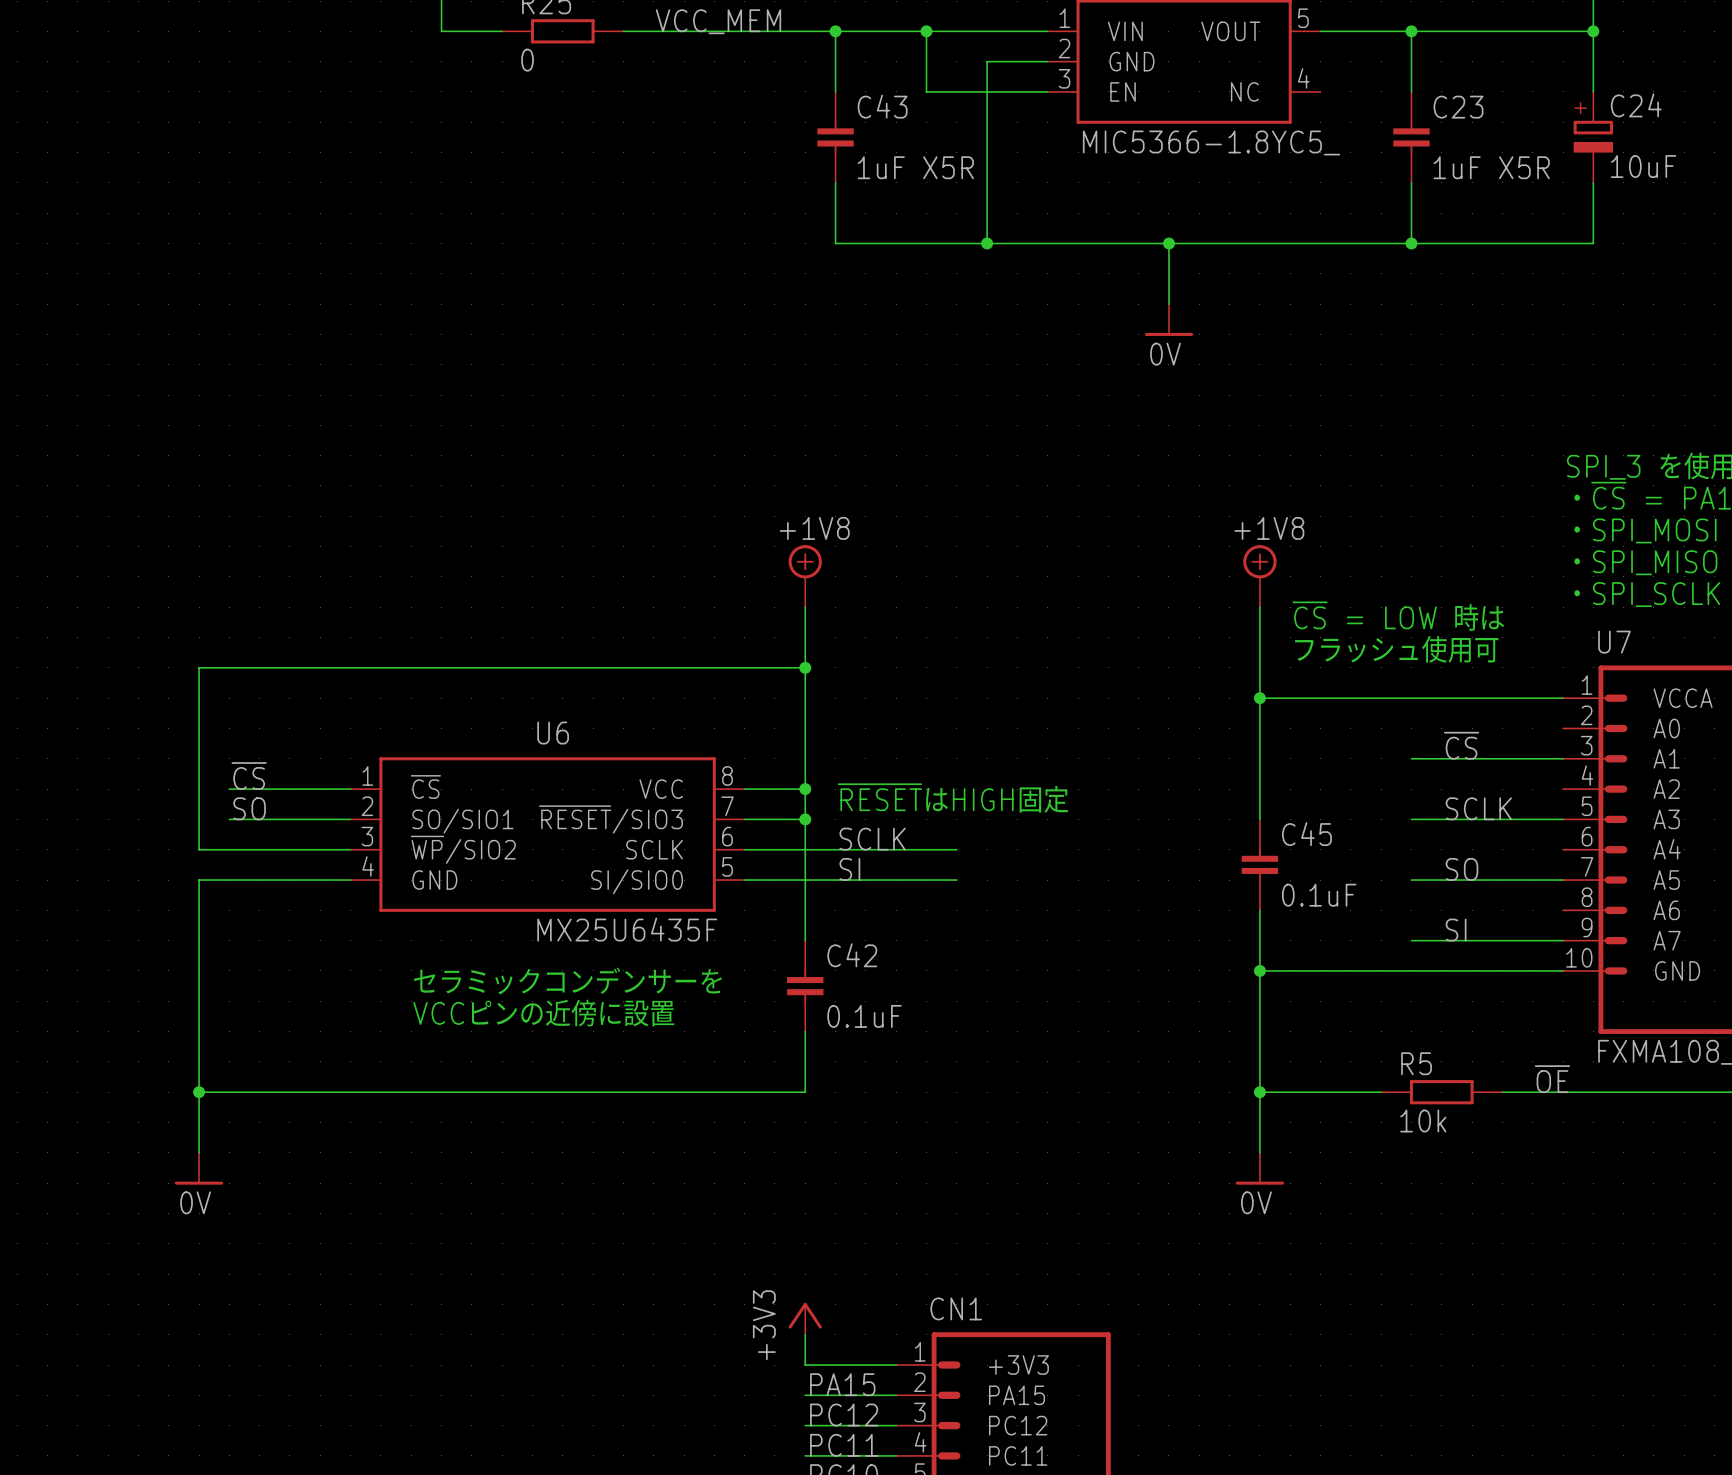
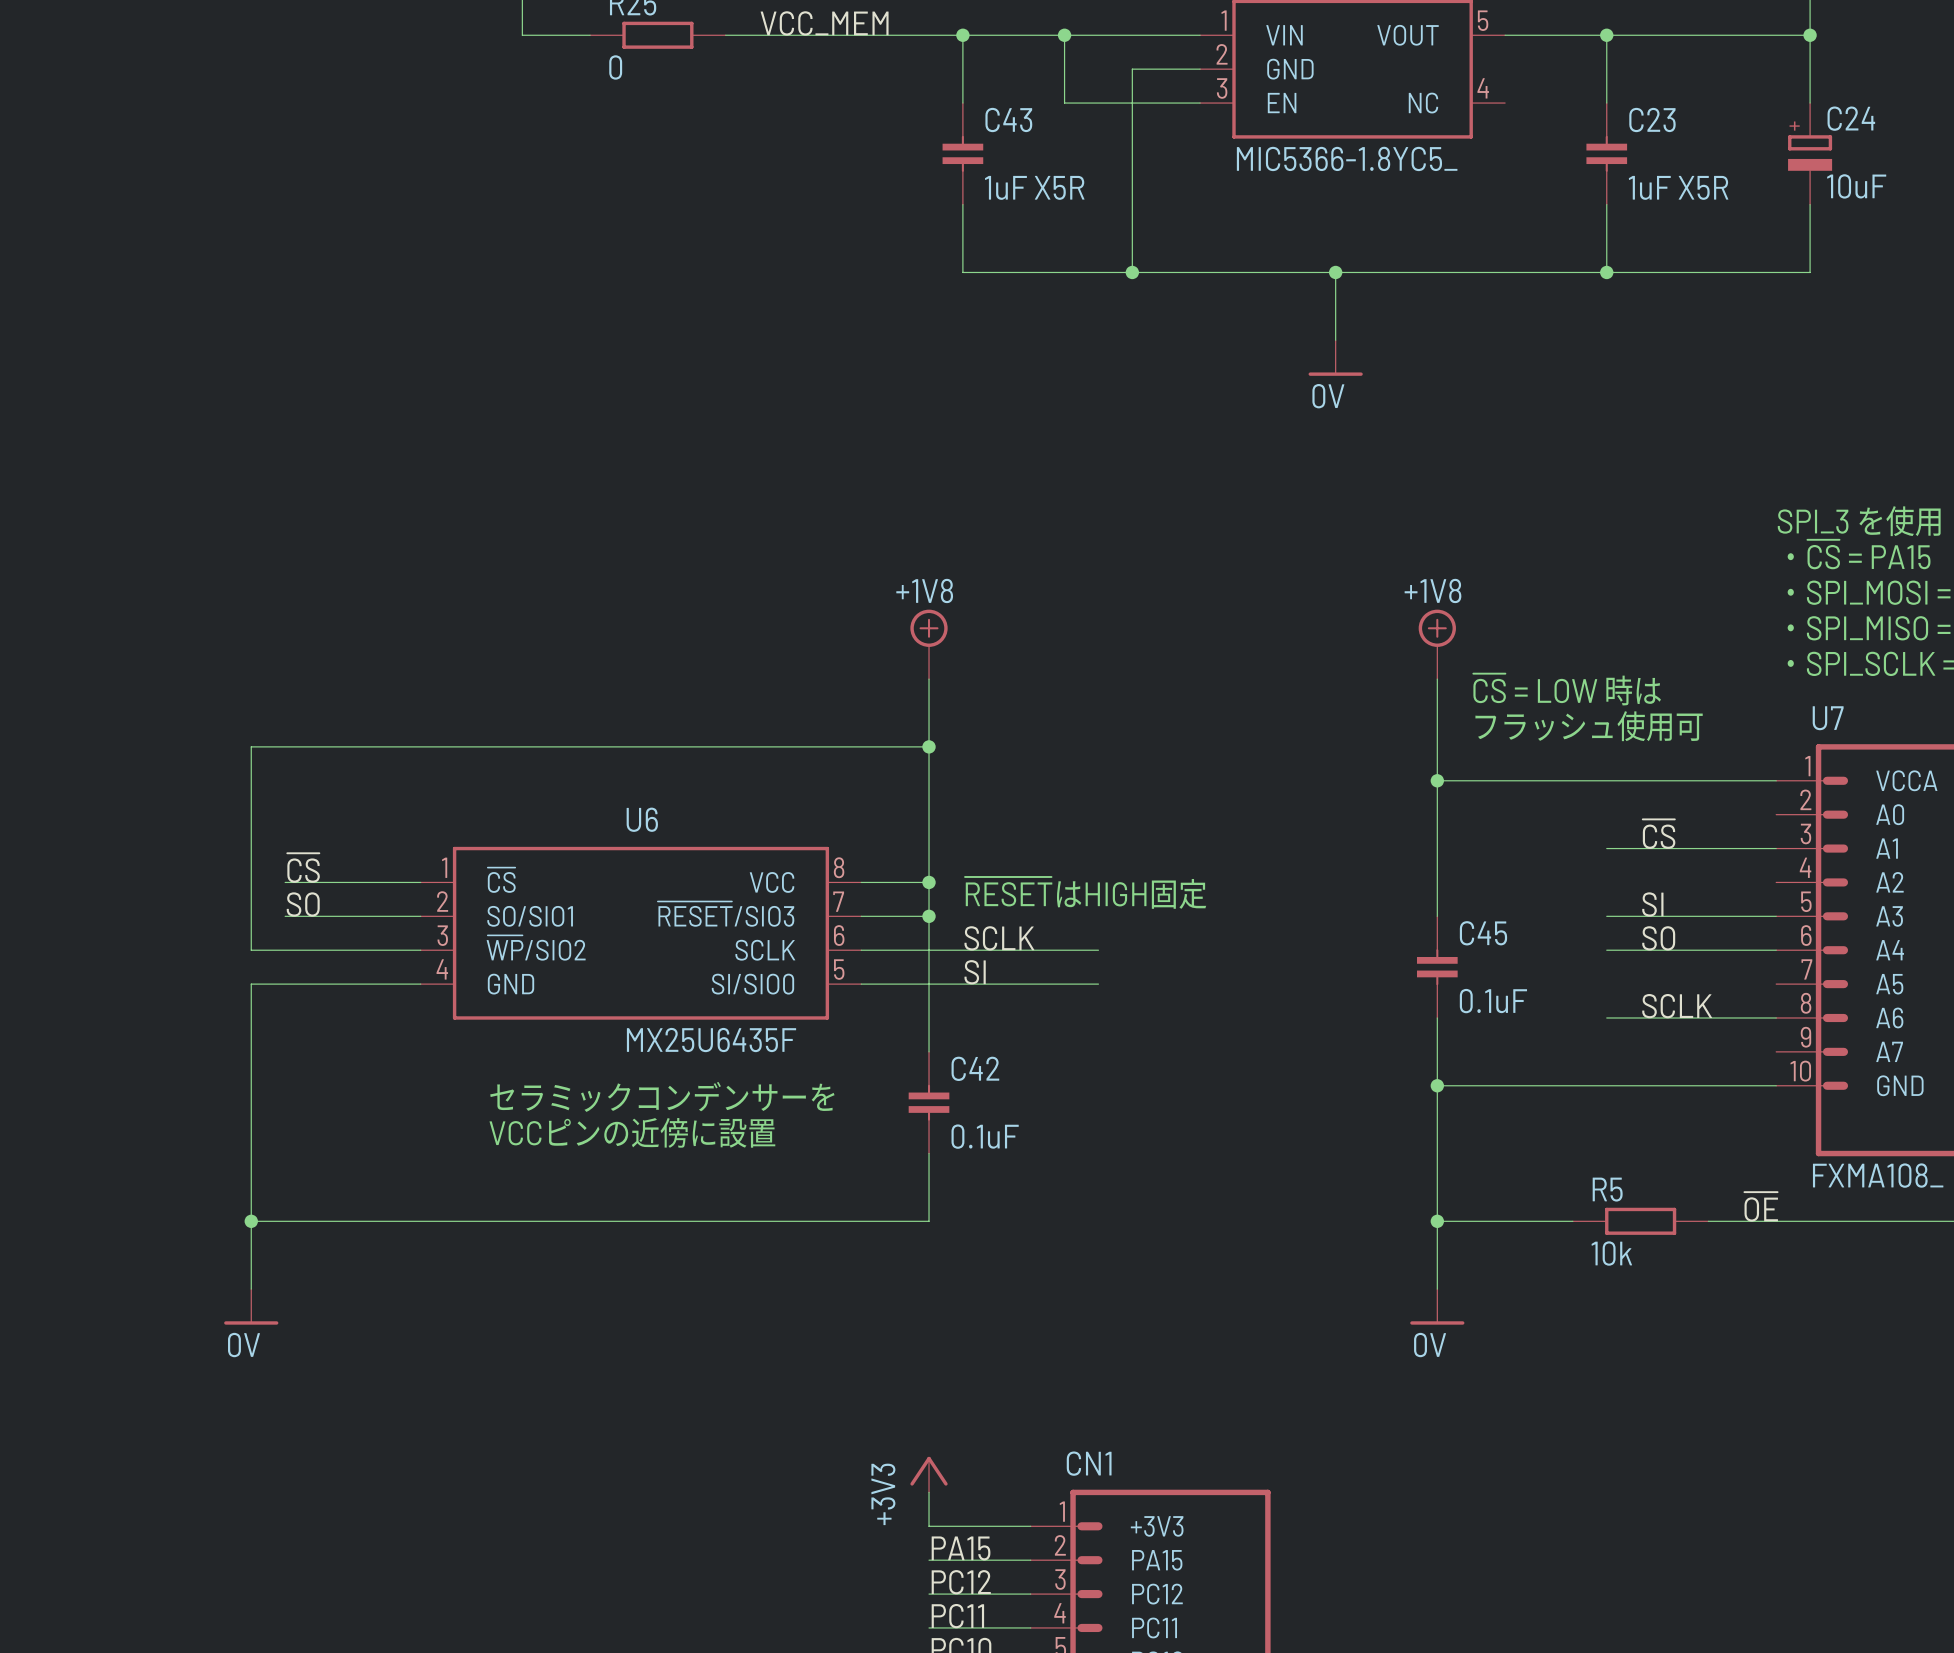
label: SCLK (1478, 808) -> SI (1652, 904)
label position: SO (1461, 869) -> SO (1658, 938)
wire: (1411, 880) (1563, 880) -> (1606, 950) (1776, 950)
label: none -> SCLK (1677, 1006)
label: SI (1456, 930) -> none
wire: (1411, 940) (1563, 940) -> (1606, 1017) (1776, 1017)

